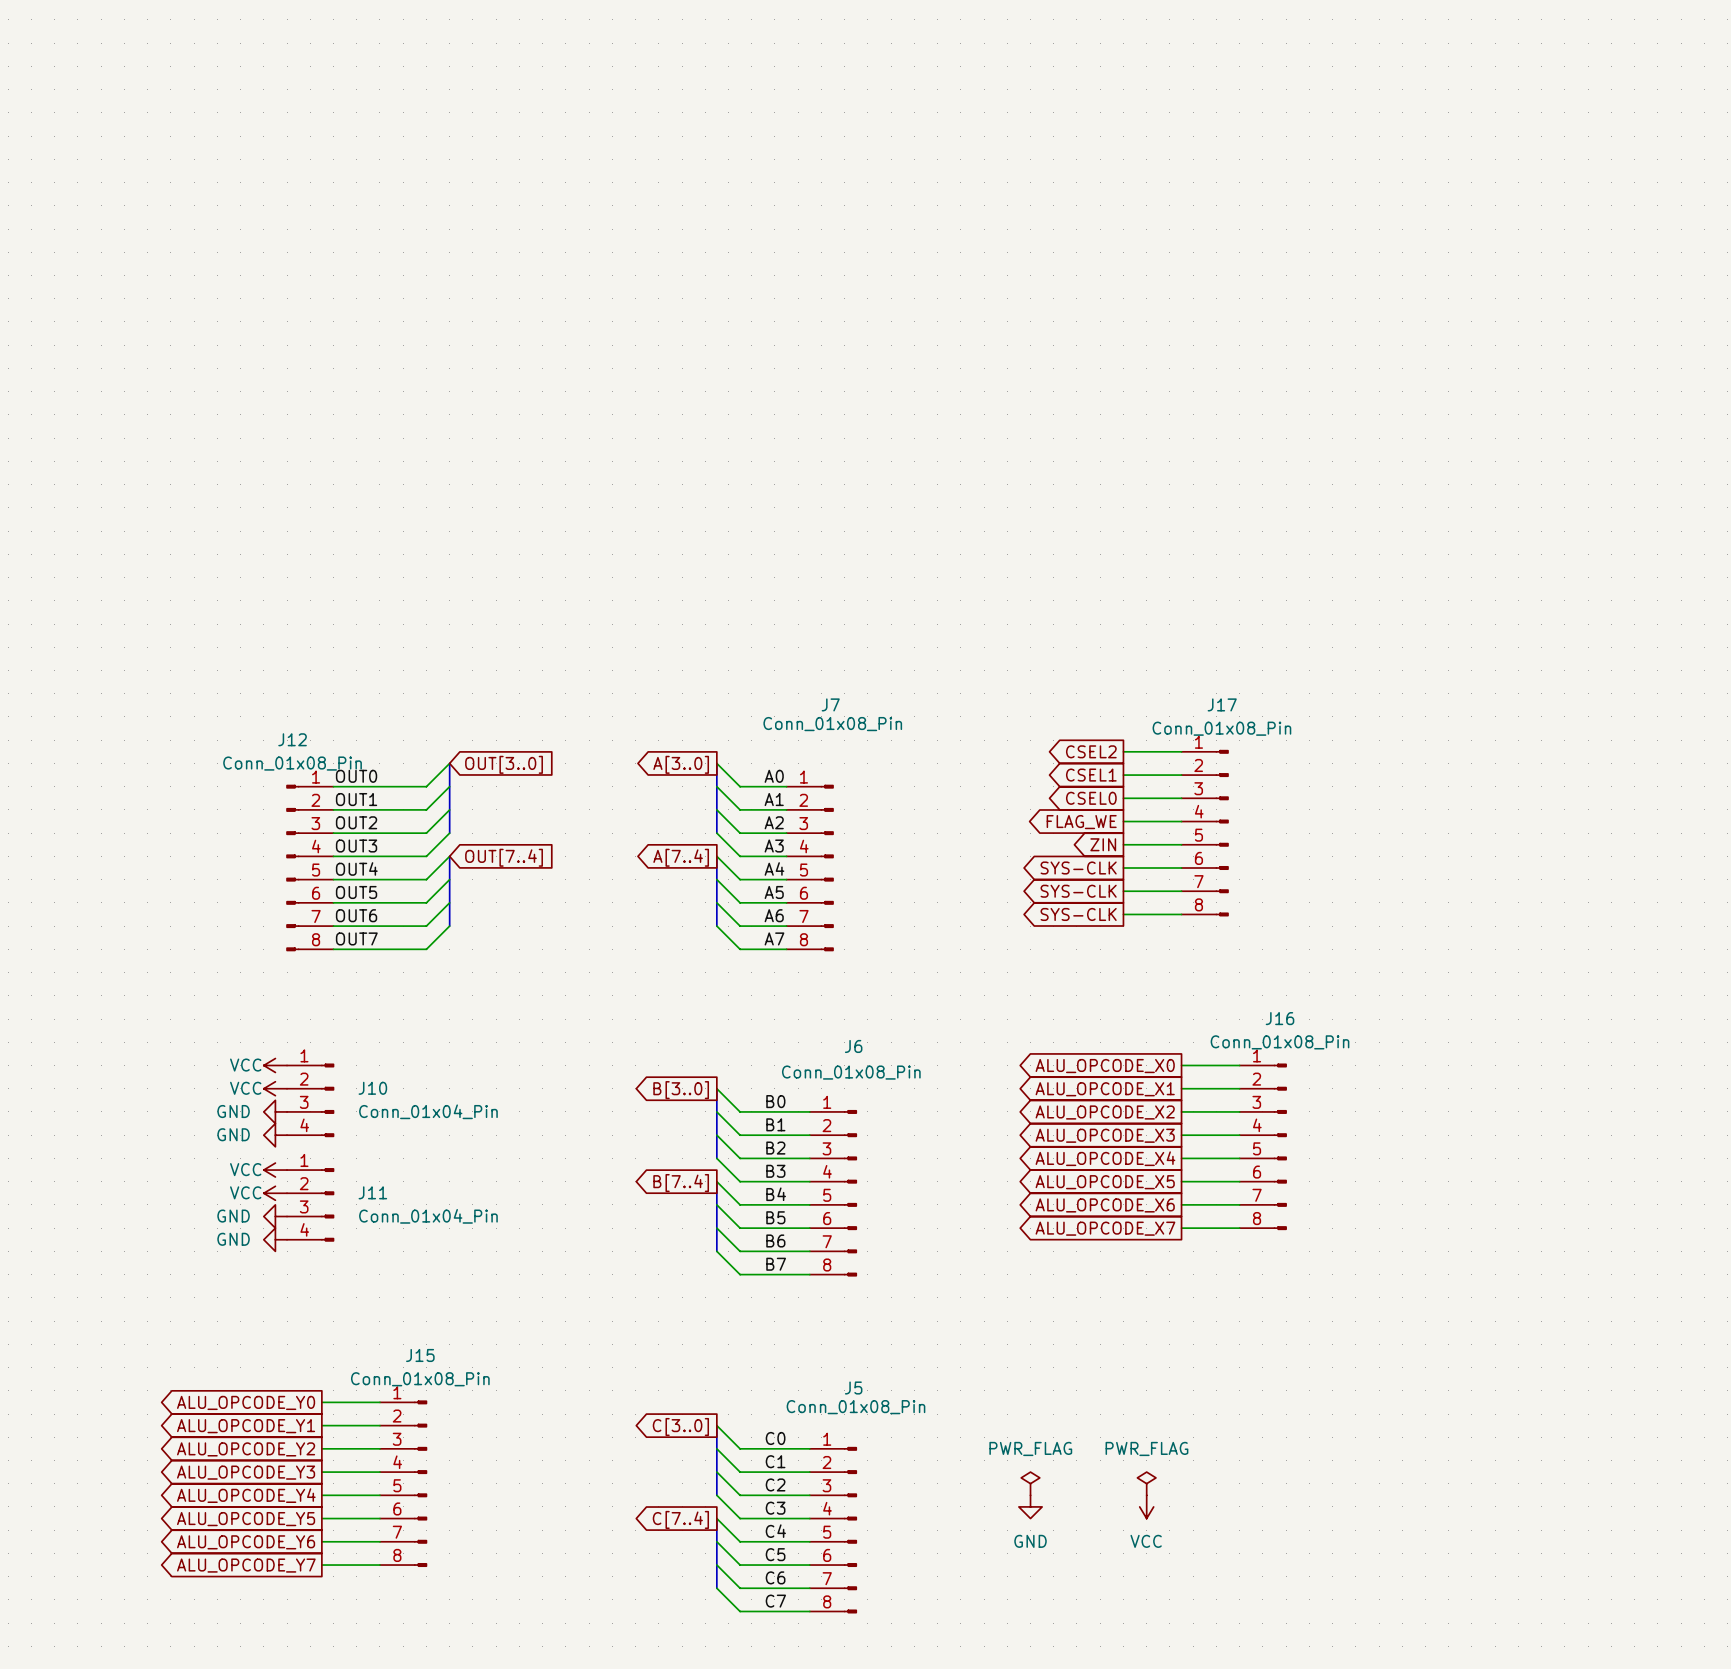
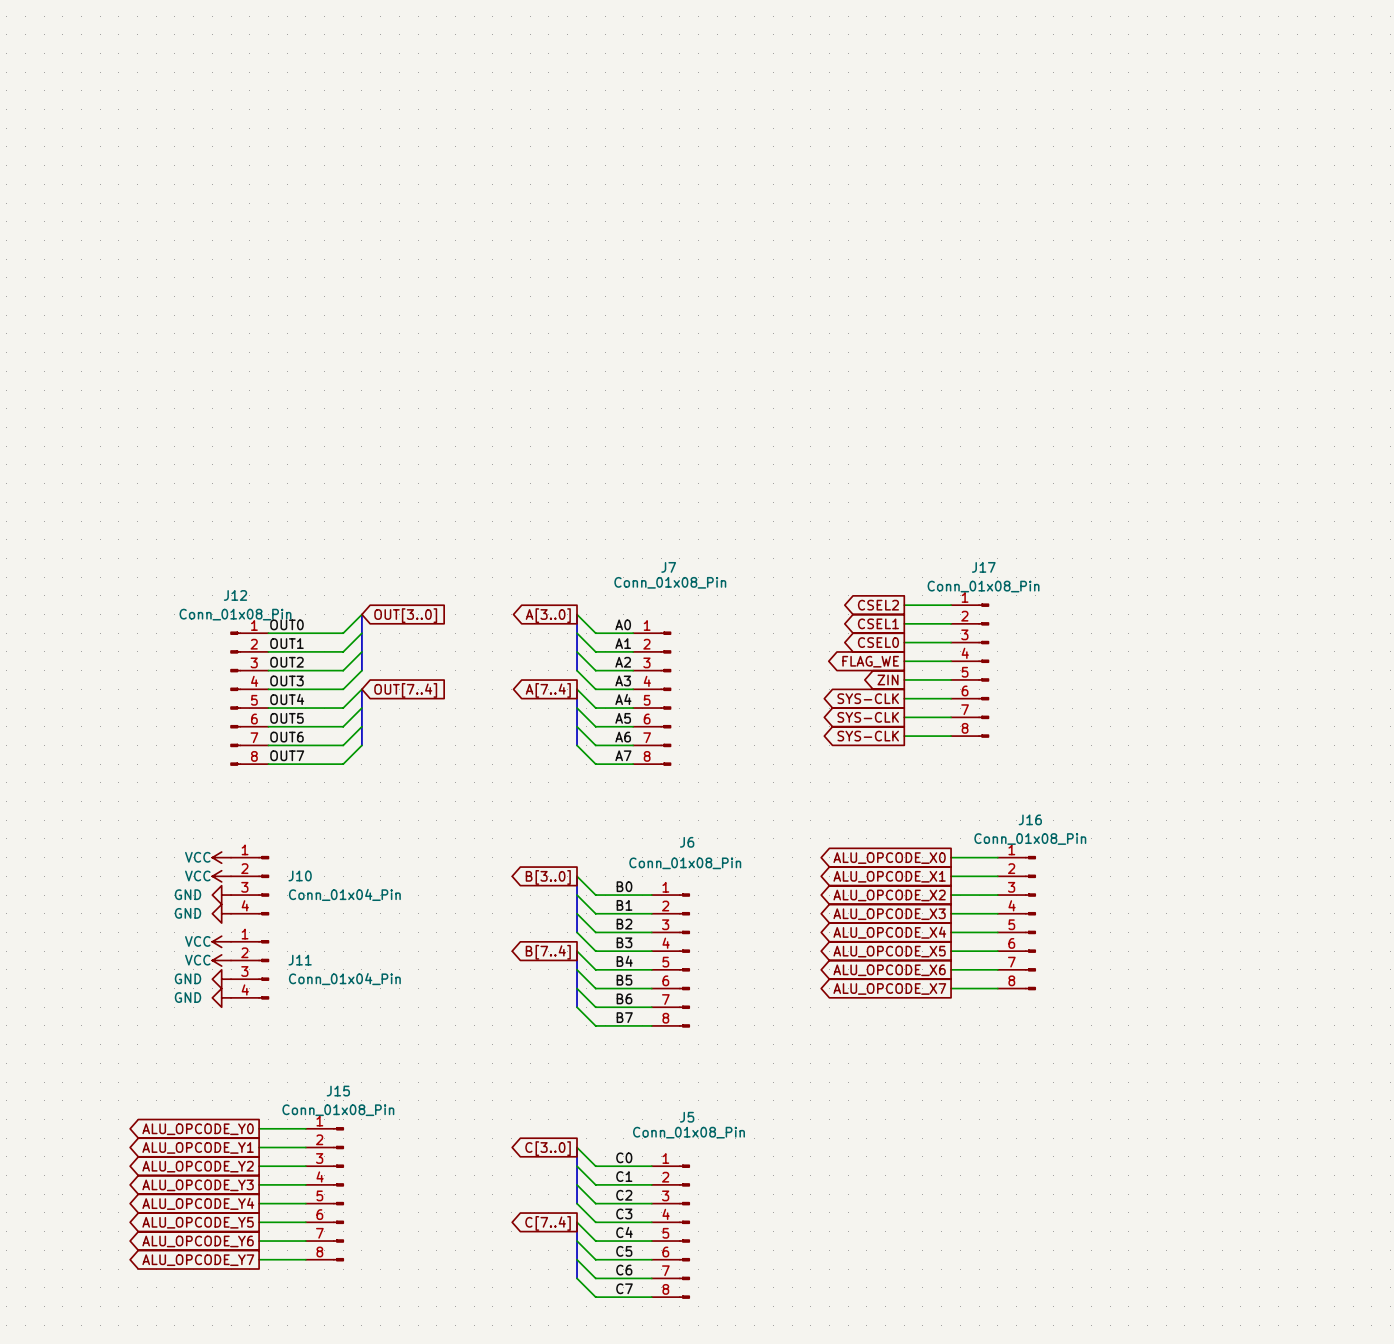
power symbol: PWR_FLAG (1030, 1483) -> none
power symbol: PWR_FLAG (1146, 1483) -> none
power symbol: GND (1030, 1506) -> none
power symbol: VCC (1146, 1506) -> none

